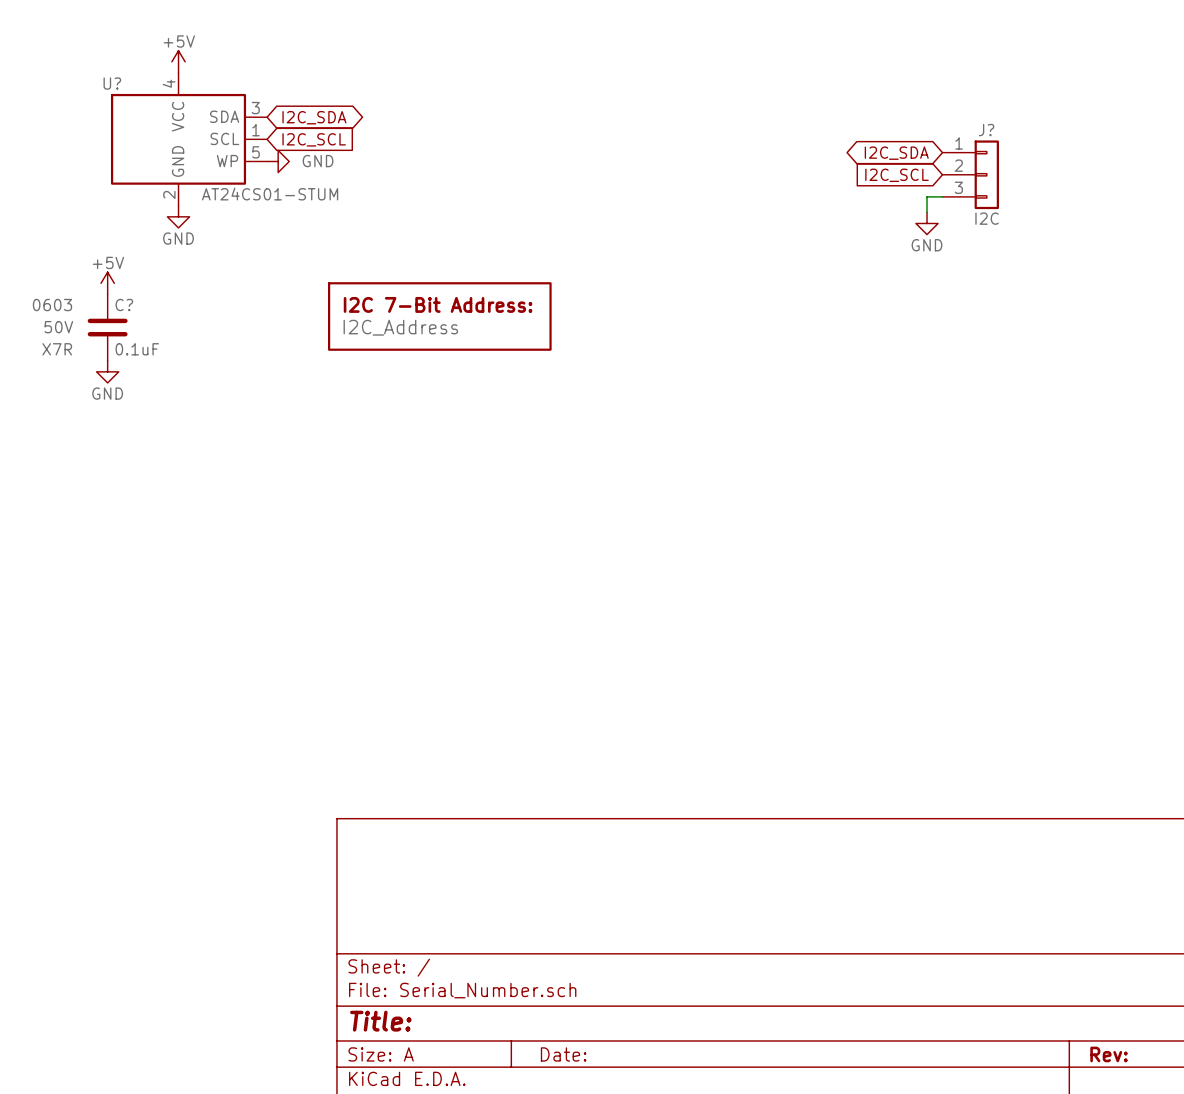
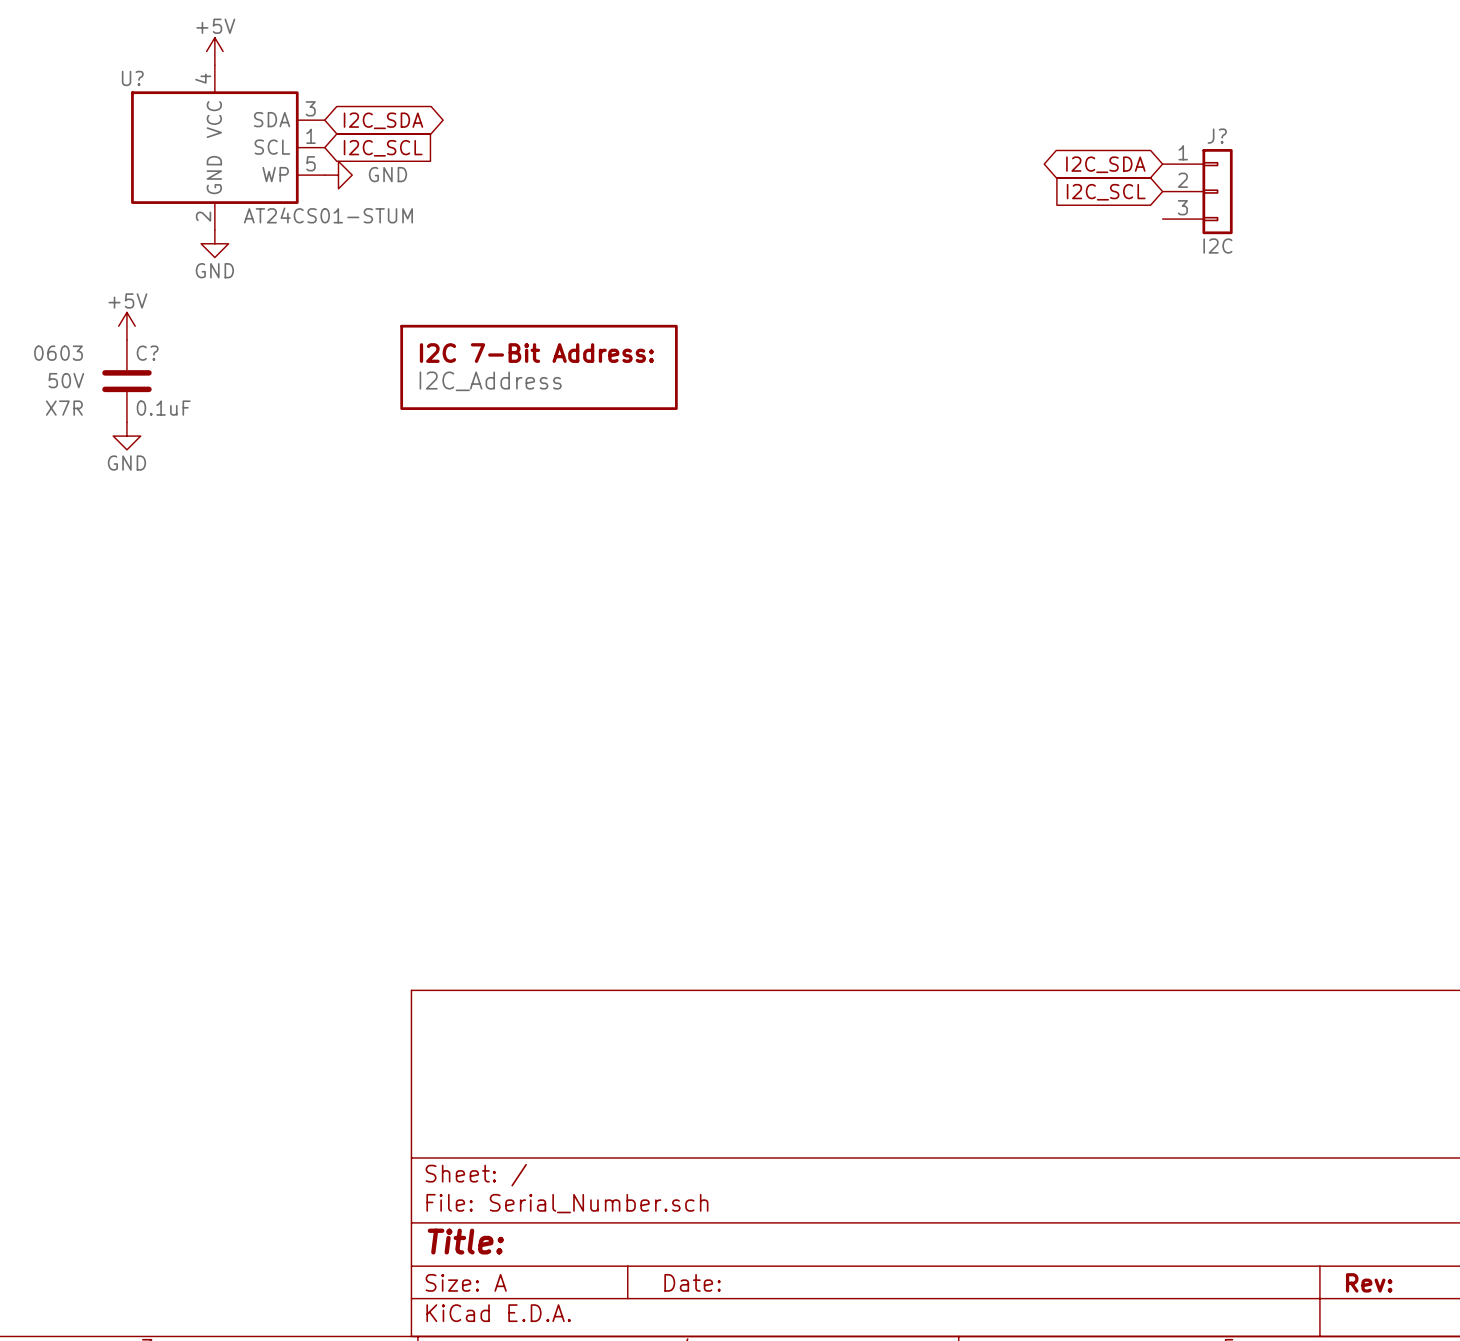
wire: (942, 196) (927, 196) (927, 212) -> none
power symbol: GND (927, 223) -> none

